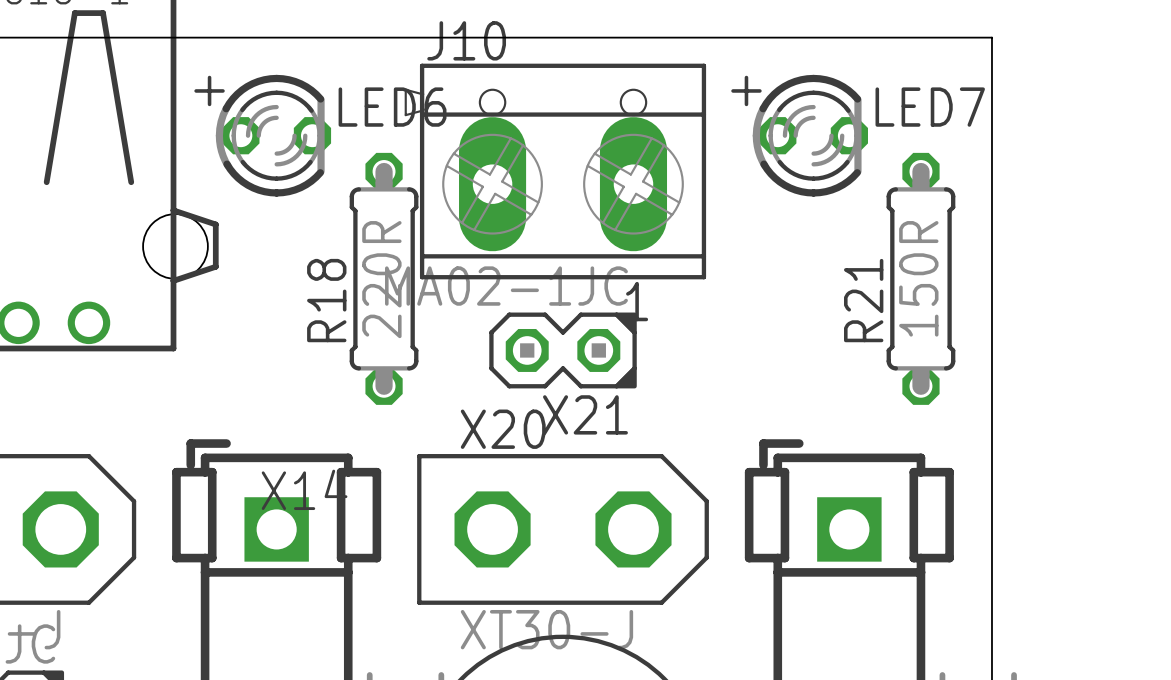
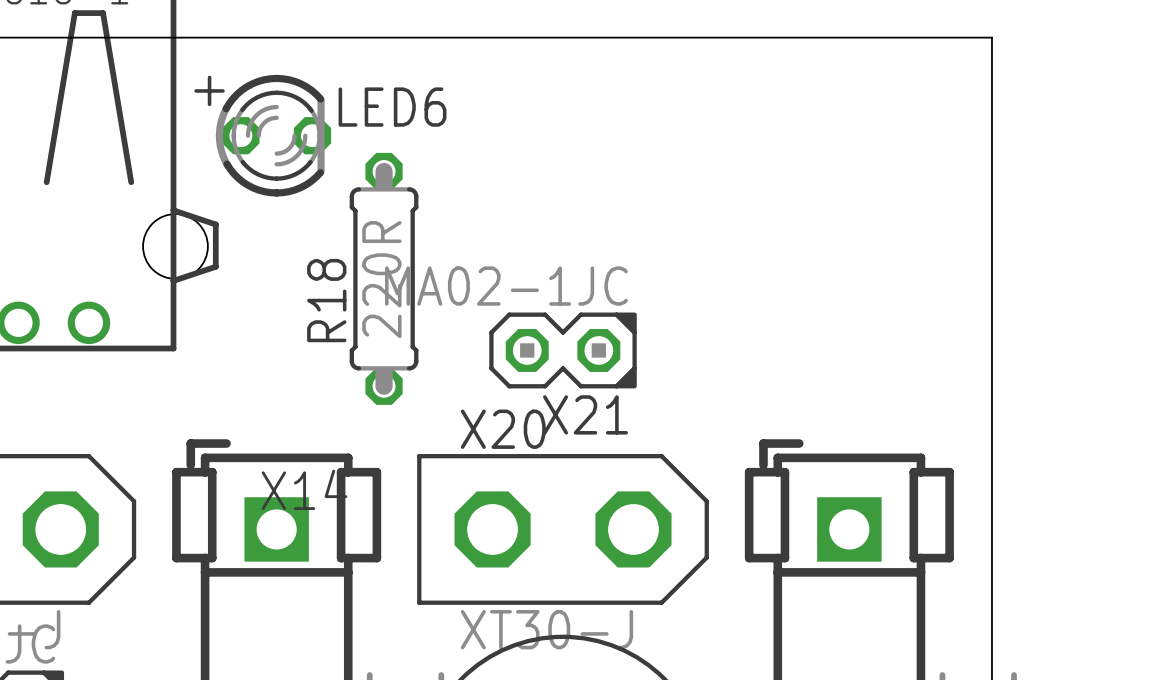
LED7: (799, 135) -> none
J10: (555, 171) -> none
R21: 150R (920, 278) -> none

